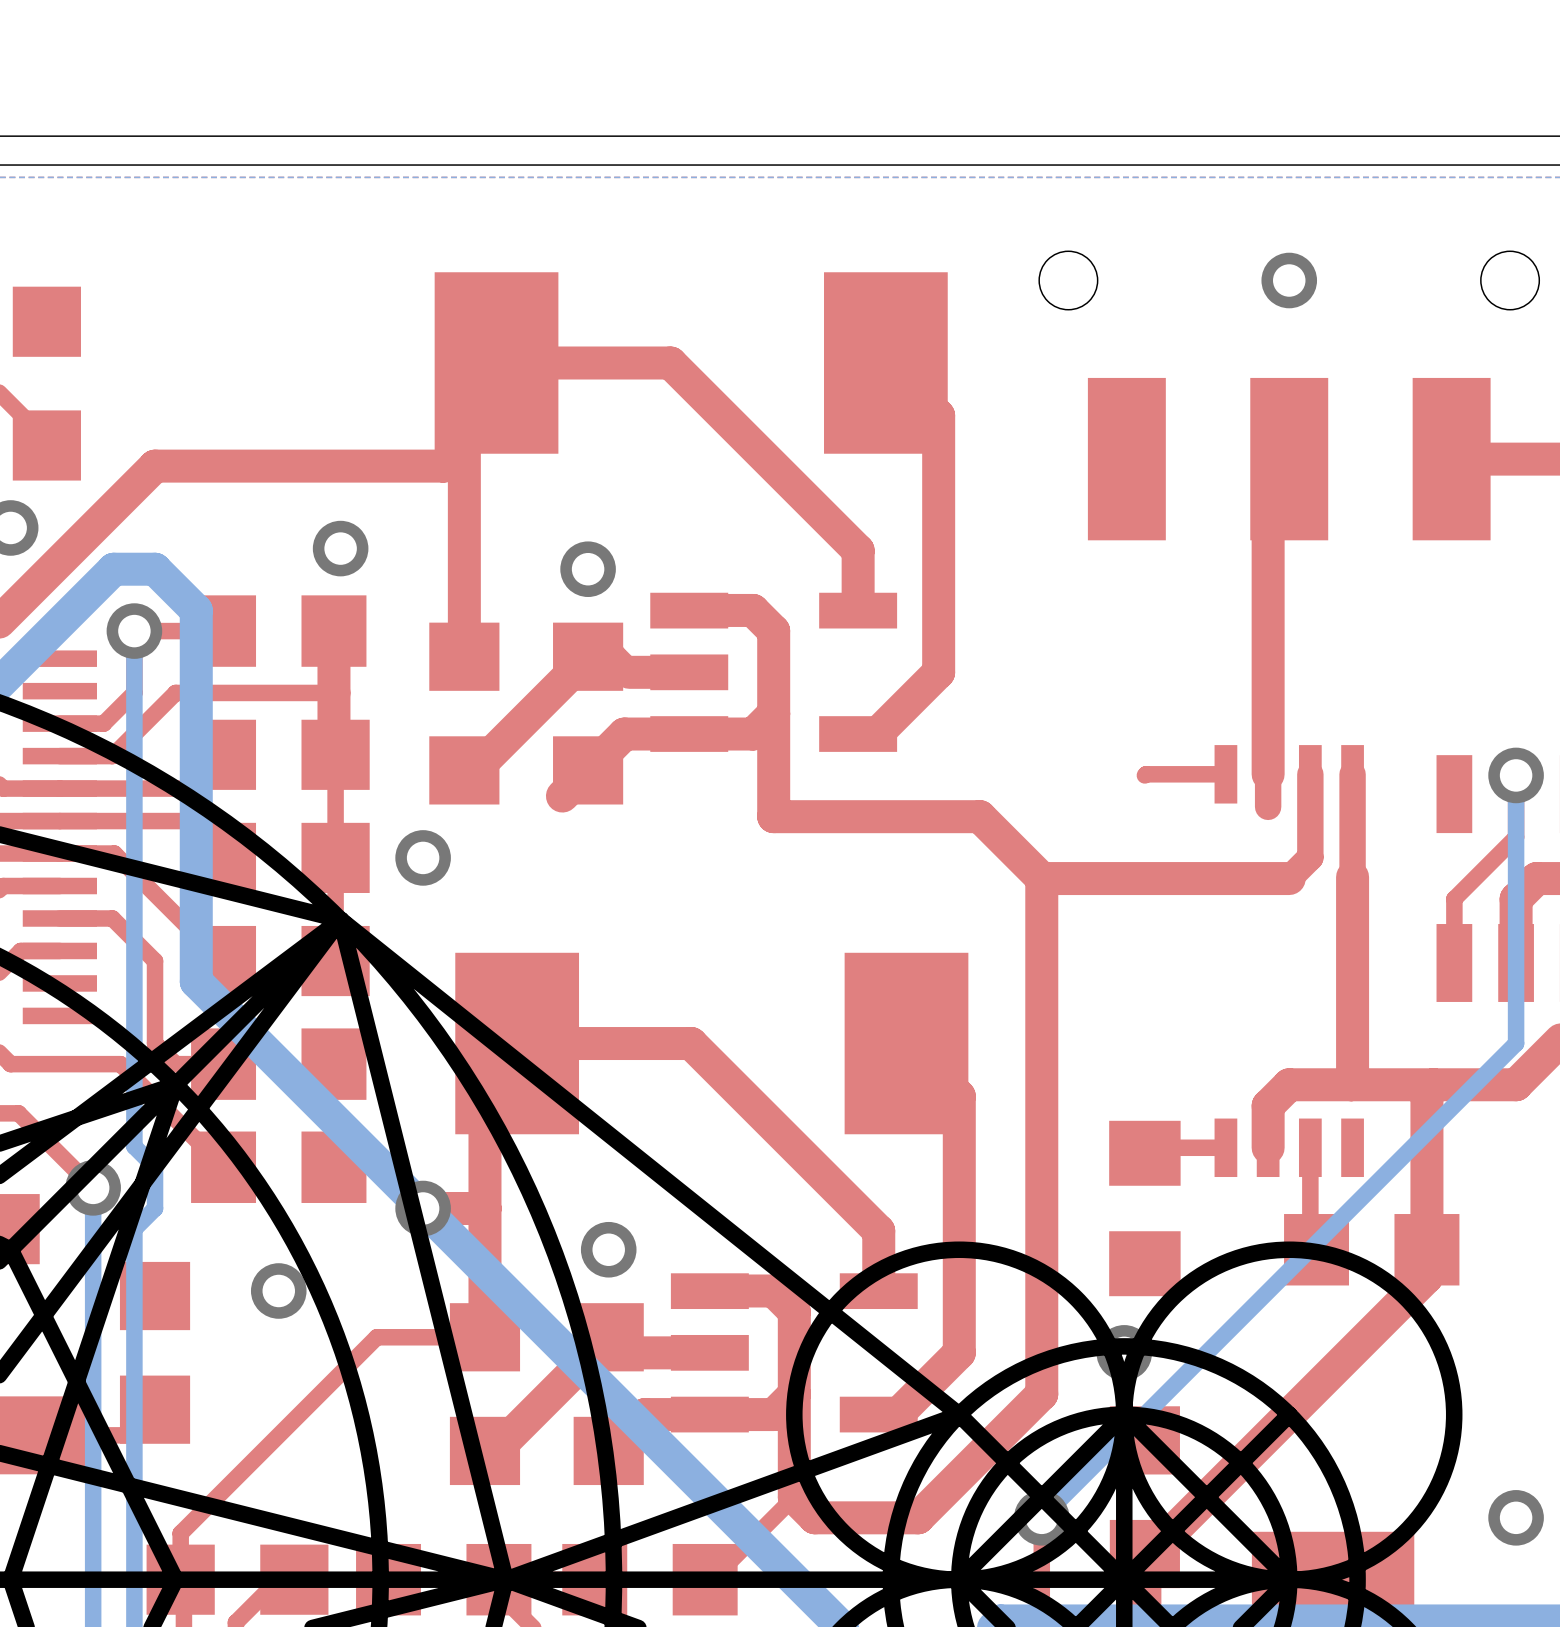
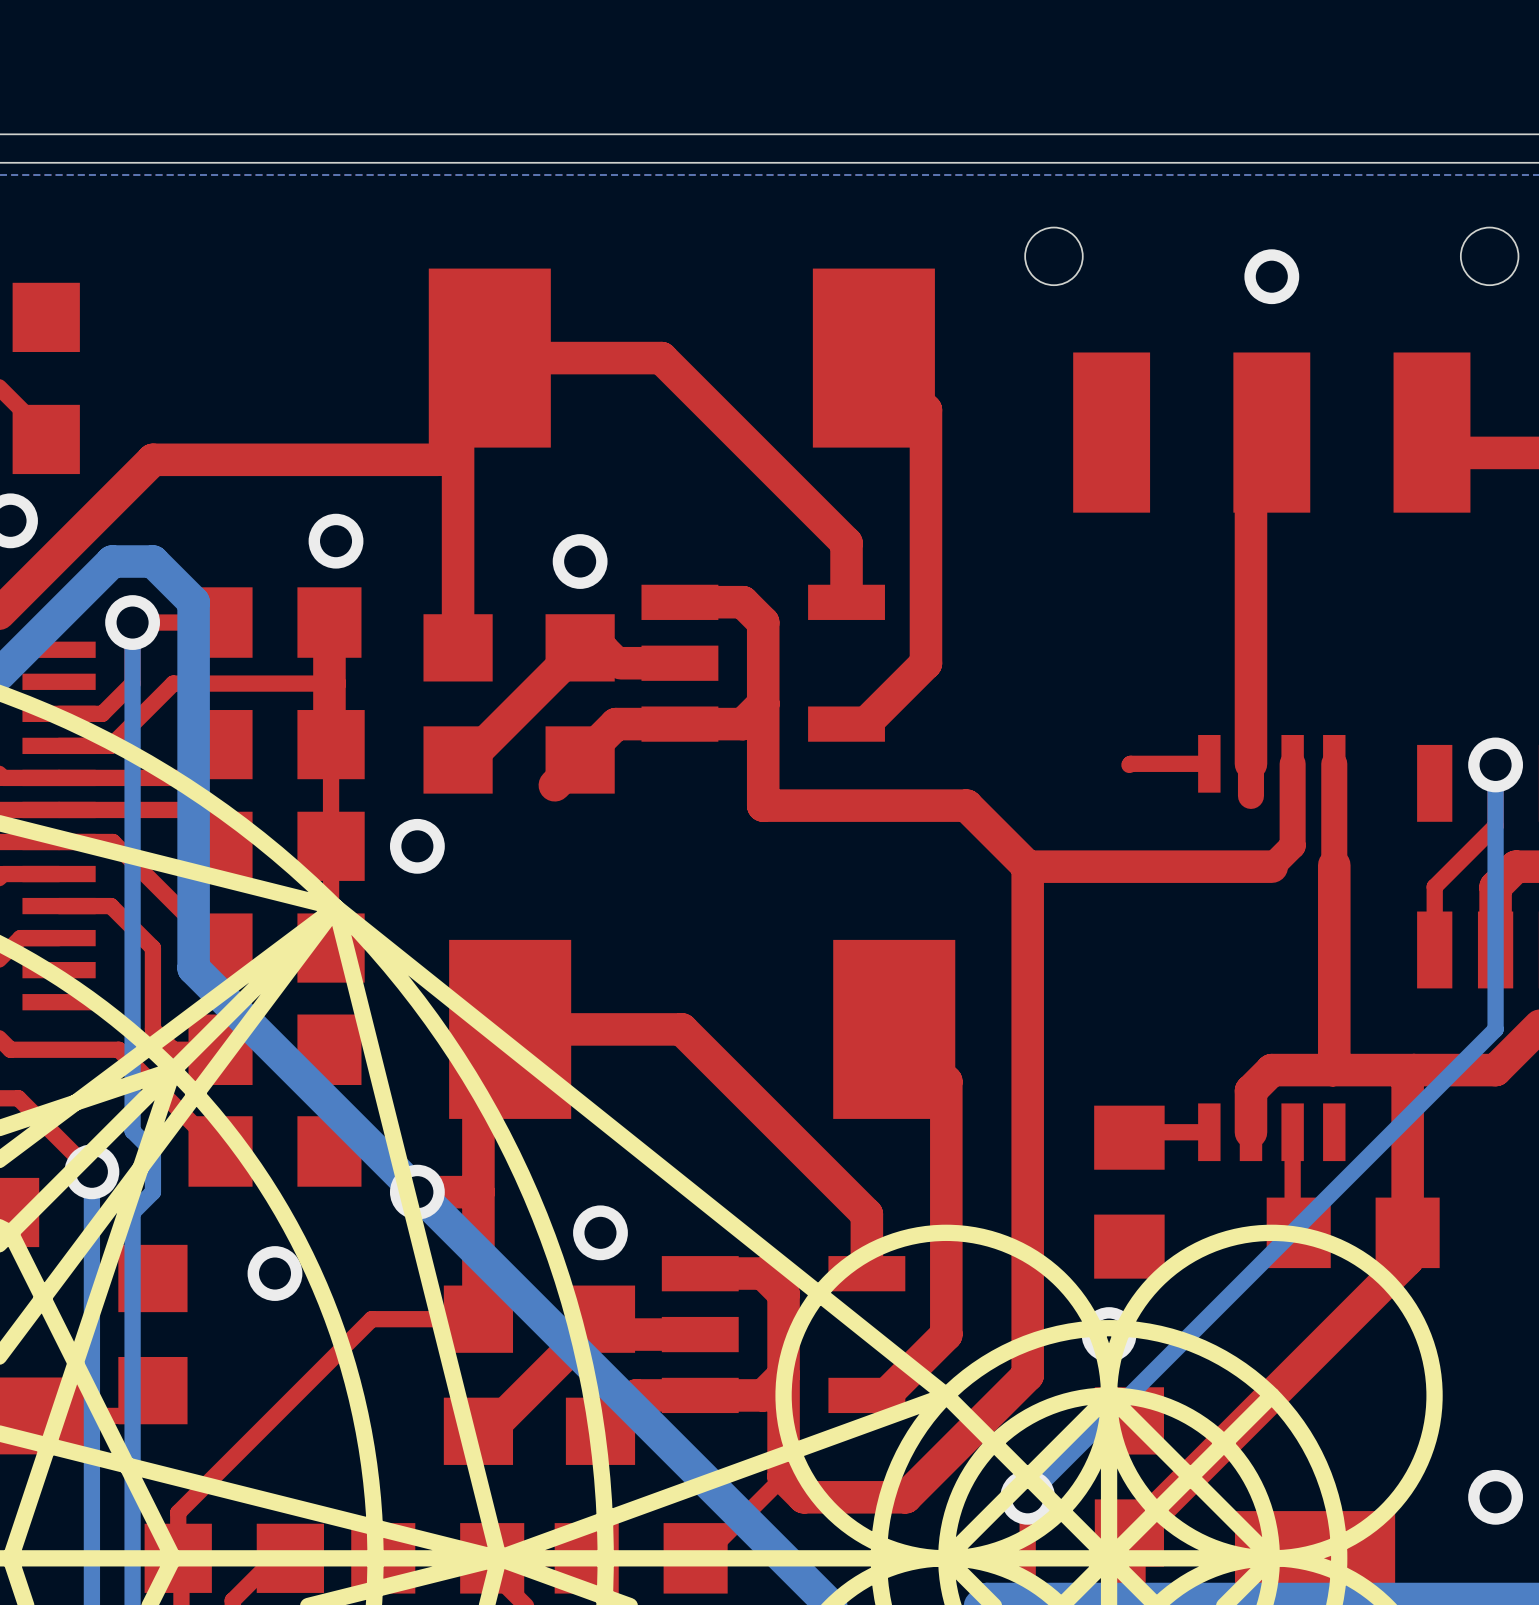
part position: (1289, 395) -> (1271, 370)

